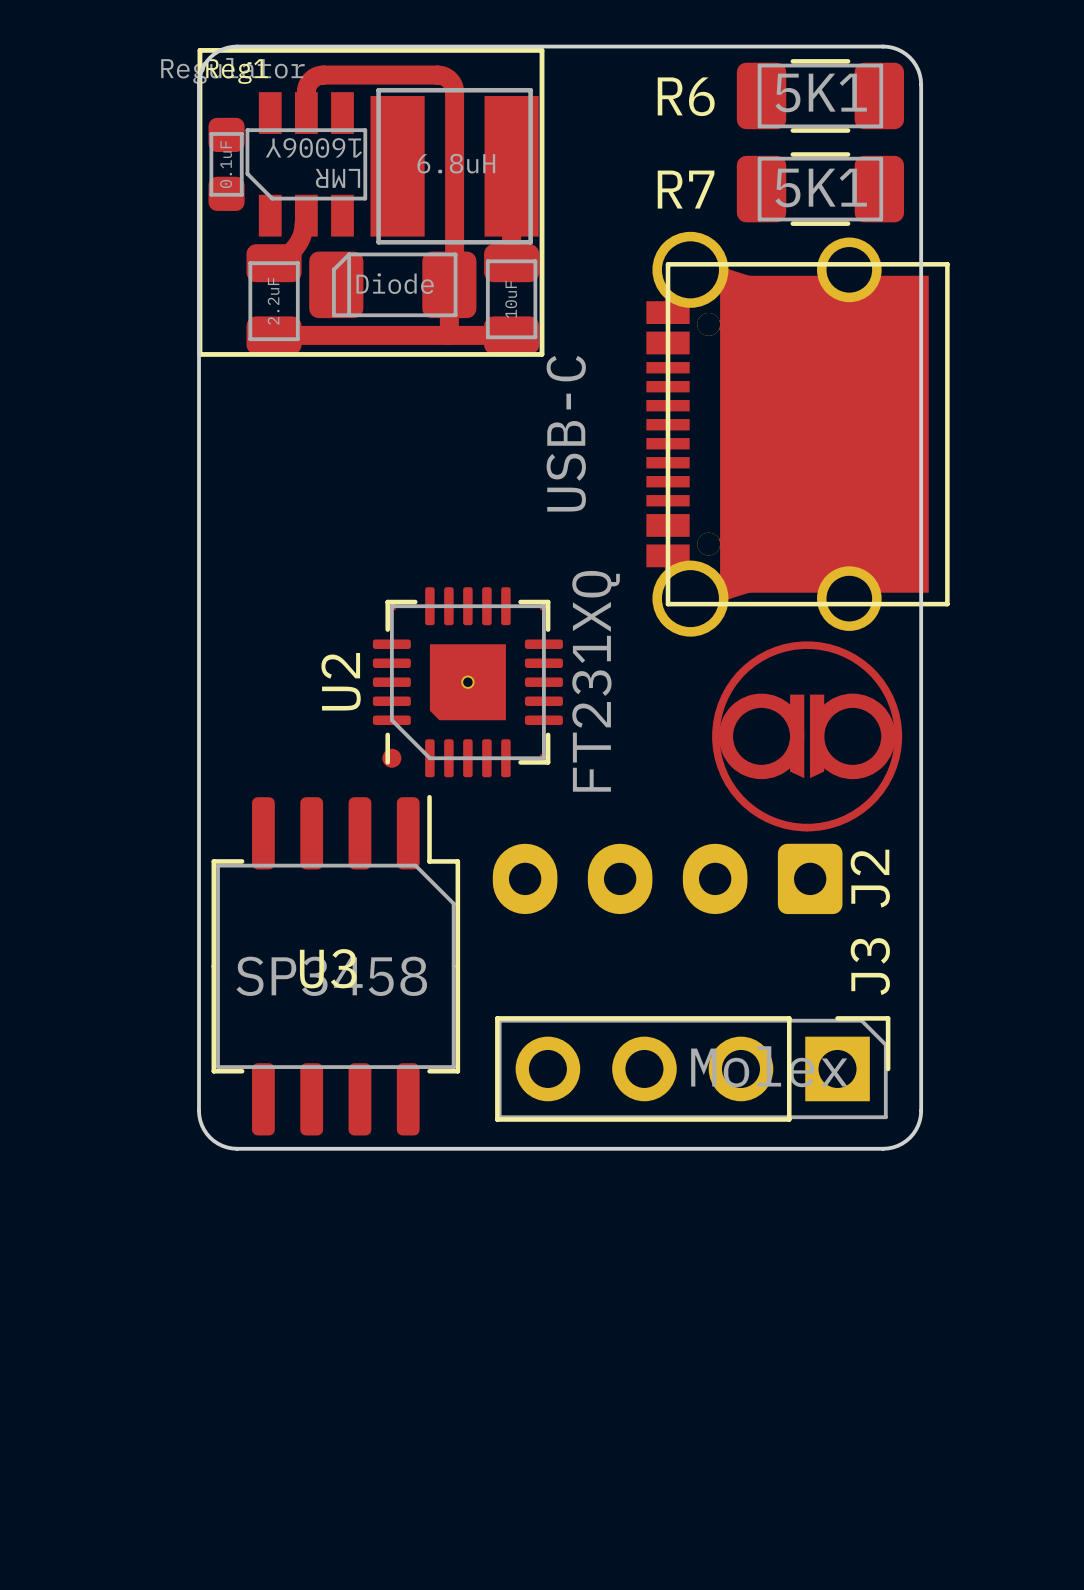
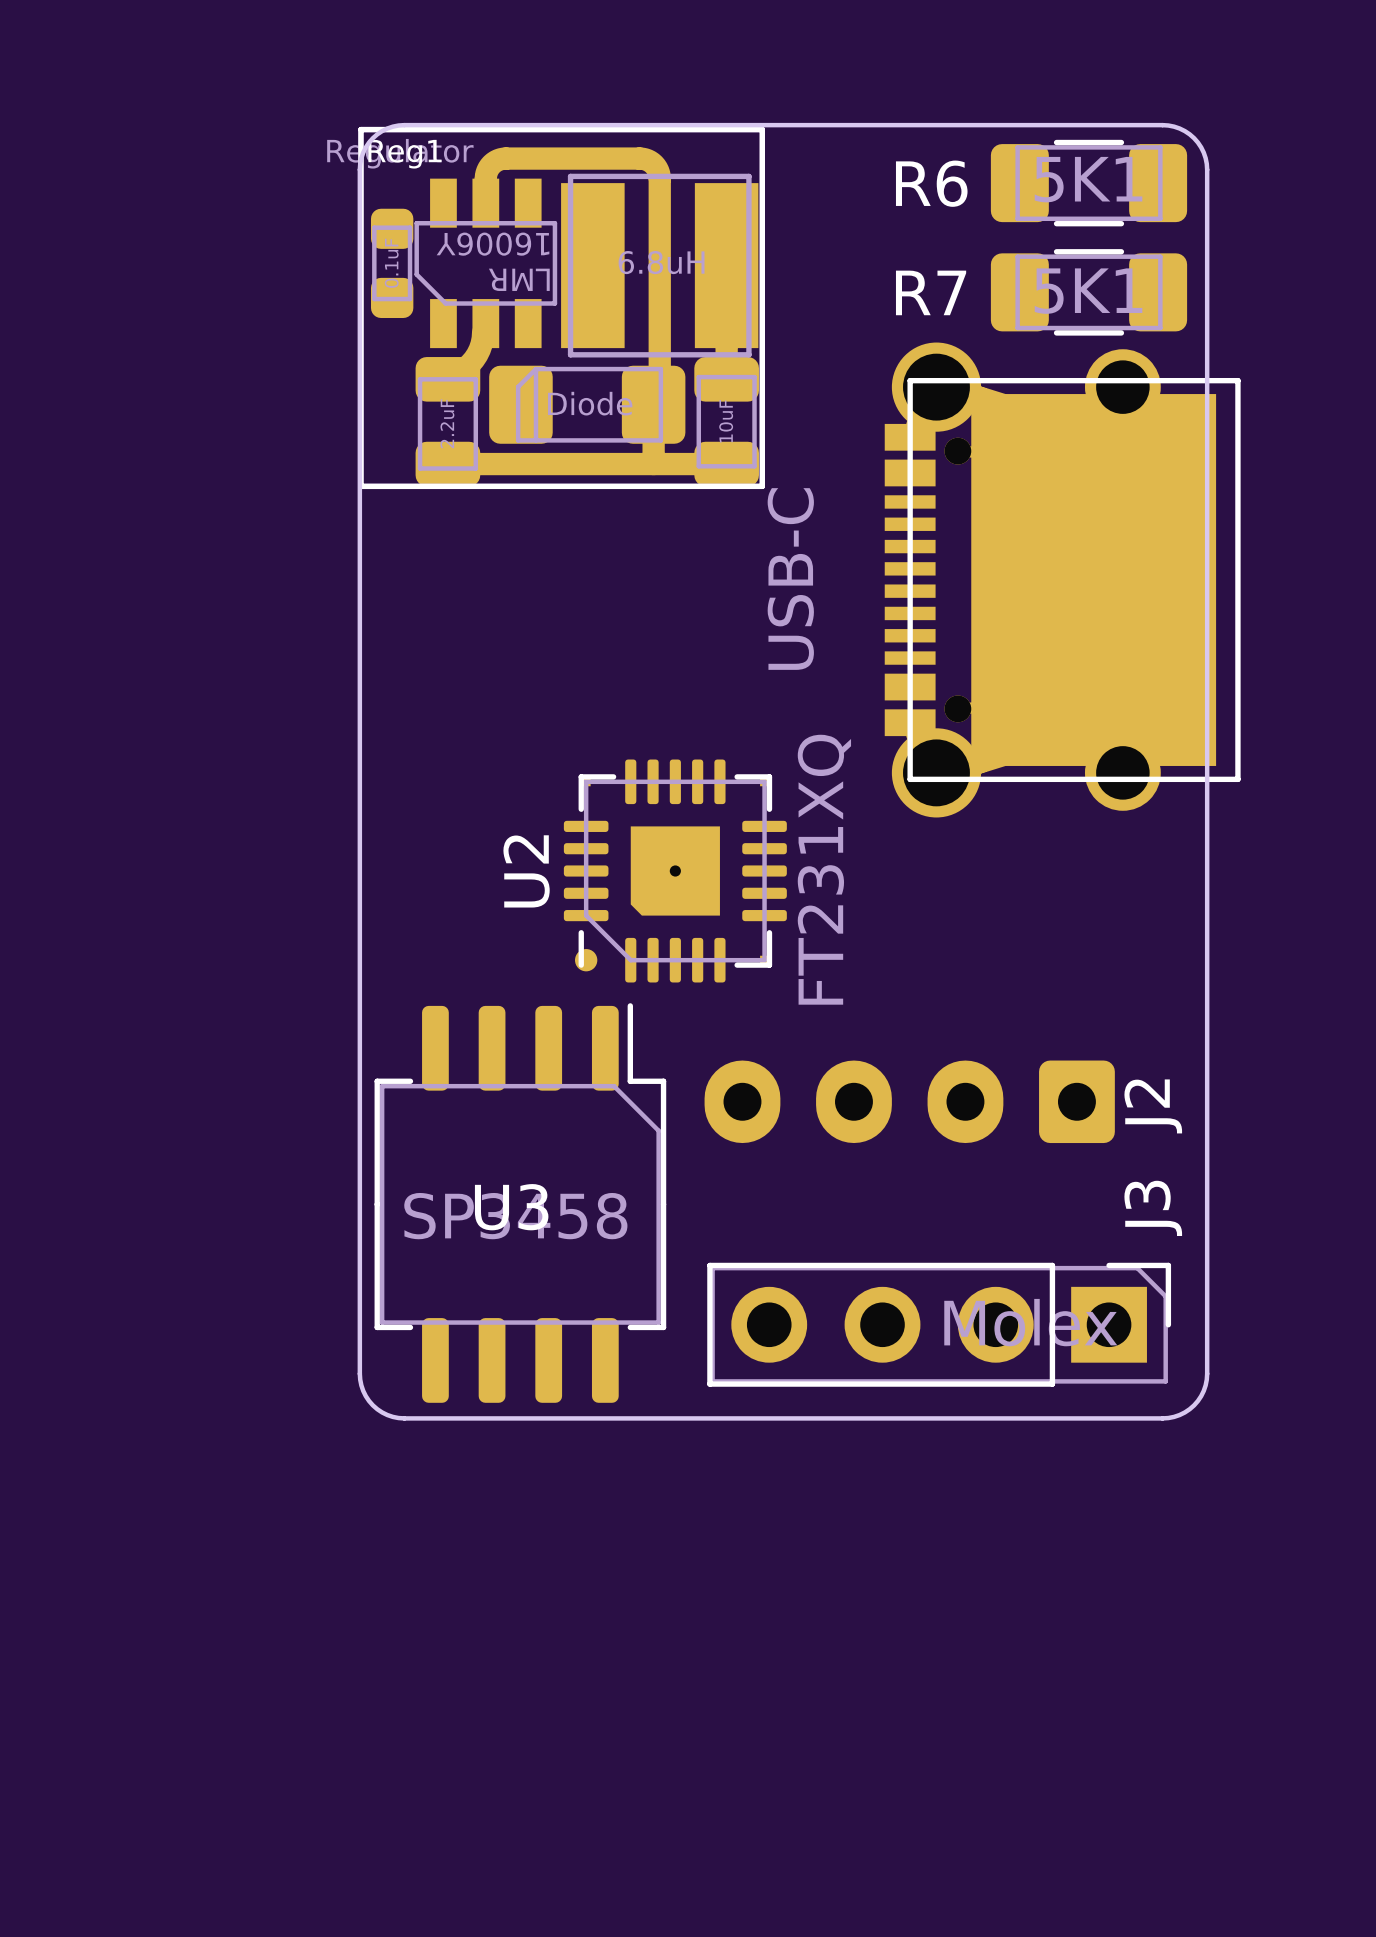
part: (807, 736) -> none

